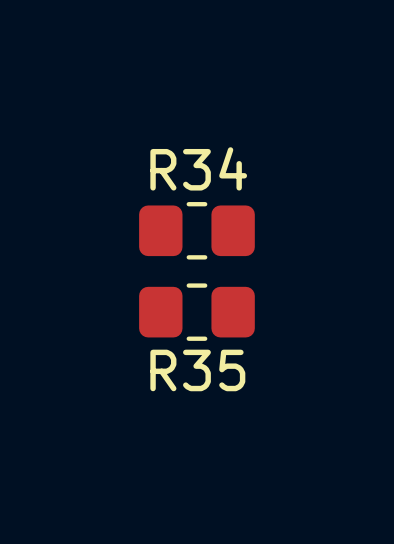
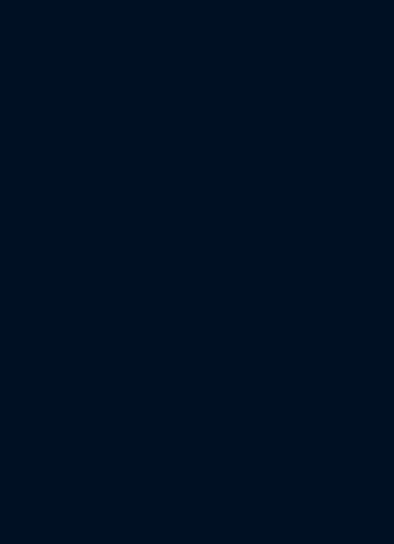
R34: (196, 230) -> none
R35: (196, 312) -> none

